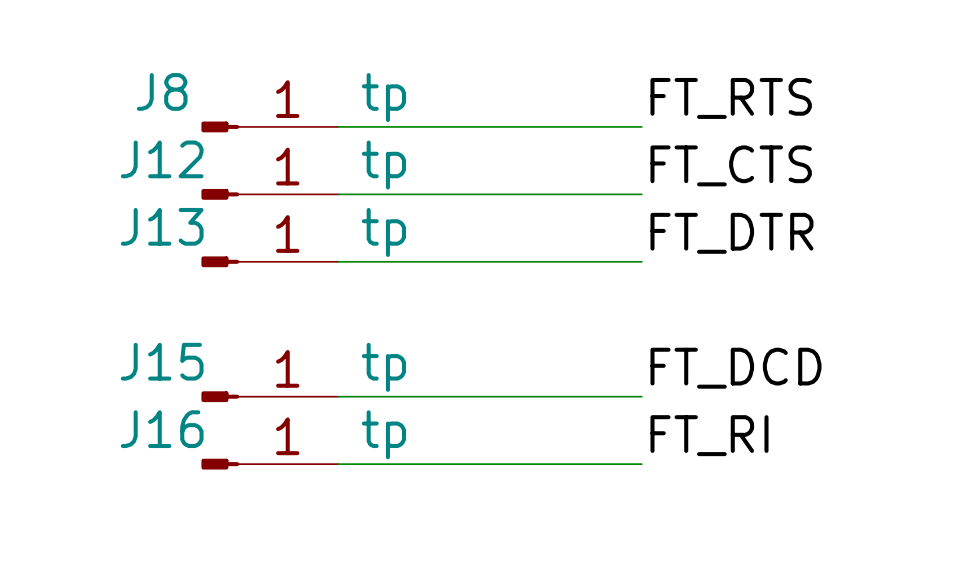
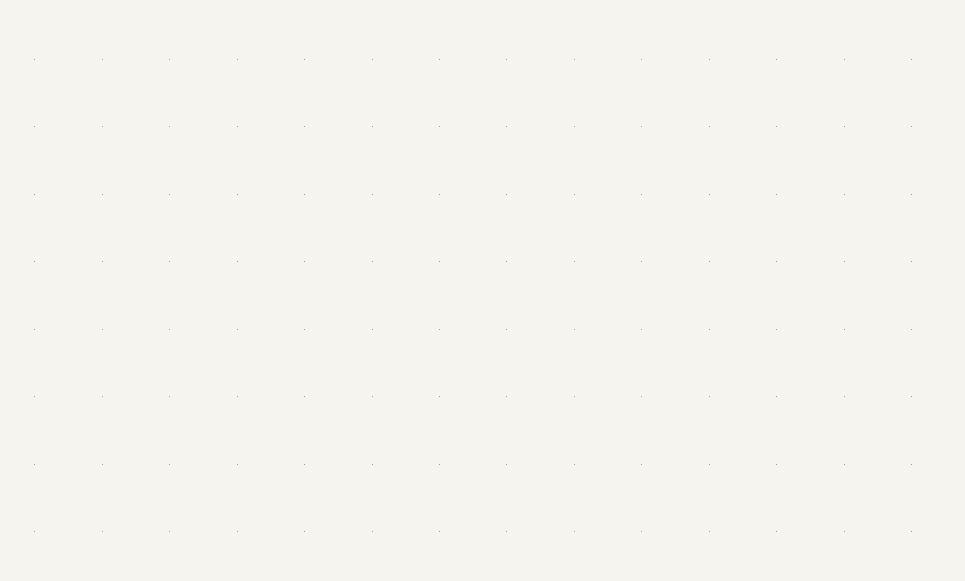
label: FT_RTS (731, 98) -> none
J8: tp (269, 126) -> none
wire: (338, 126) (641, 126) -> none
label: FT_CTS (731, 165) -> none
J12: tp (269, 194) -> none
wire: (338, 194) (641, 194) -> none
label: FT_DTR (731, 233) -> none
J13: tp (269, 261) -> none
wire: (338, 261) (641, 261) -> none
label: FT_DCD (735, 368) -> none
J15: tp (269, 396) -> none
wire: (338, 396) (641, 396) -> none
label: FT_RI (709, 435) -> none
J16: tp (269, 464) -> none
wire: (338, 464) (641, 464) -> none

